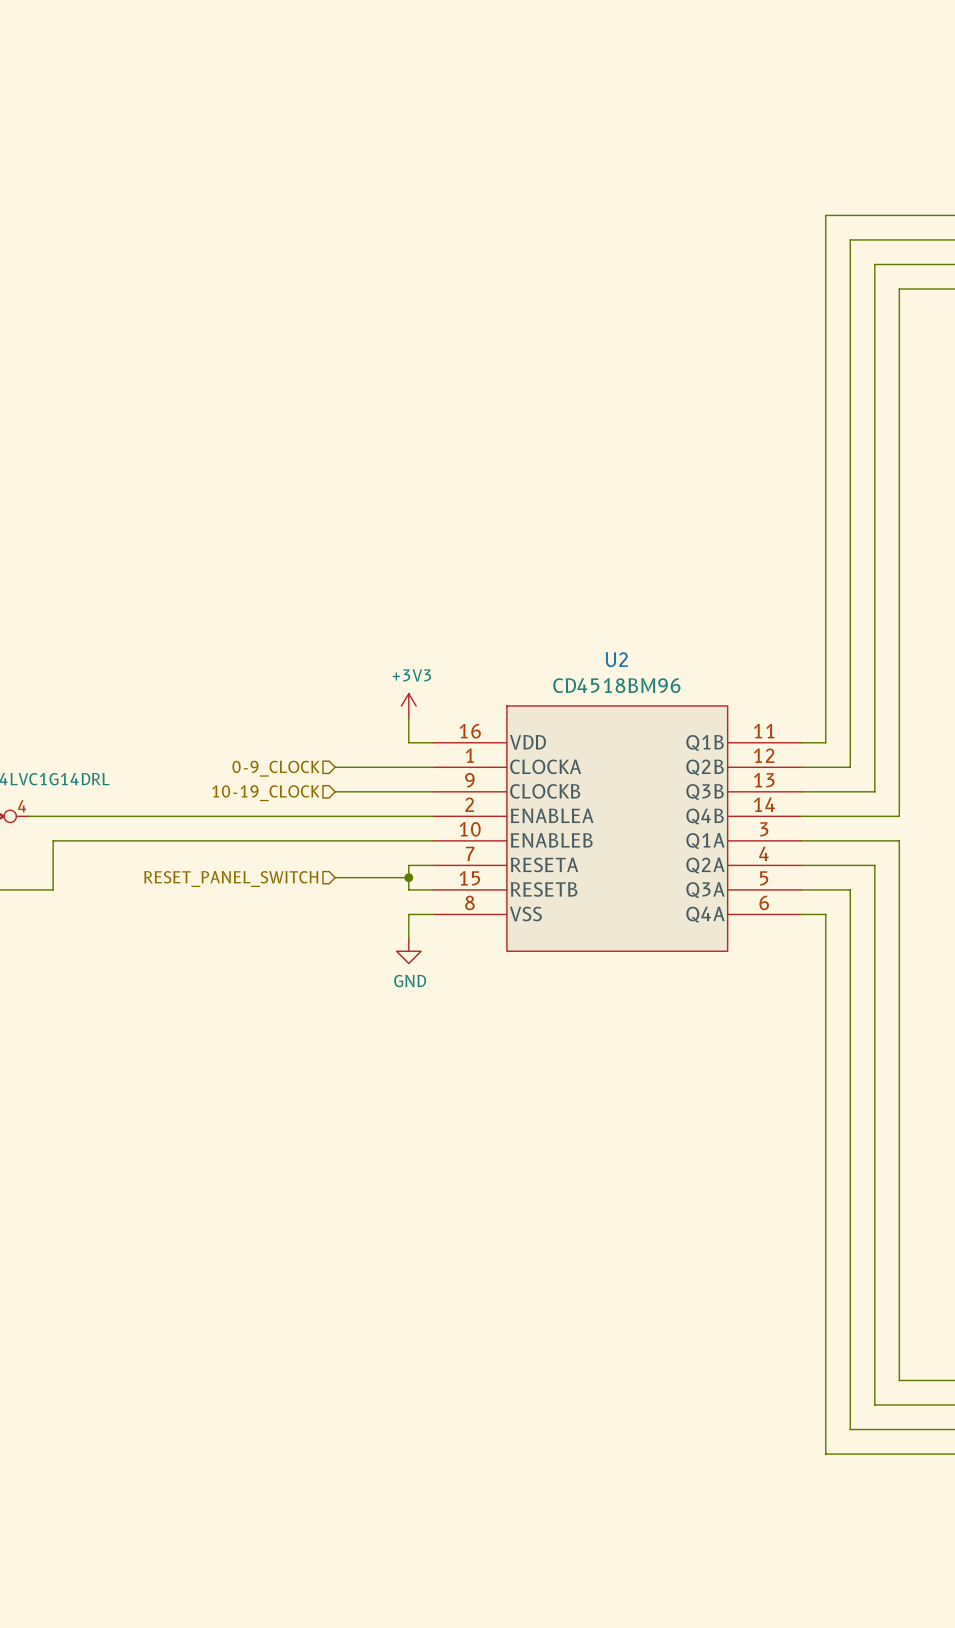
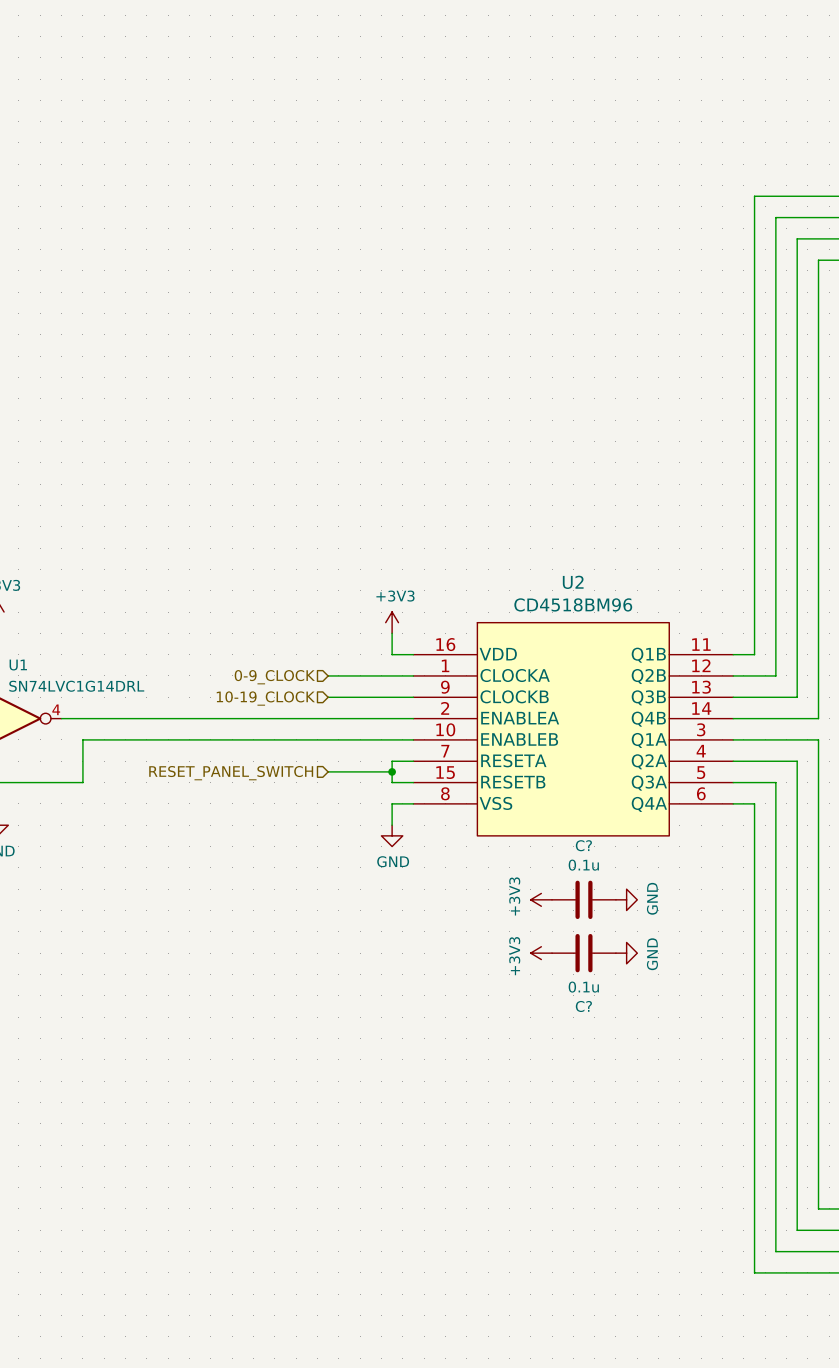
power symbol: none -> +3V3 (541, 899)
C?: none -> 0.1u (583, 899)
power symbol: none -> GND (626, 899)
power symbol: none -> +3V3 (541, 953)
C?: none -> 0.1u (583, 953)
power symbol: none -> GND (626, 953)

